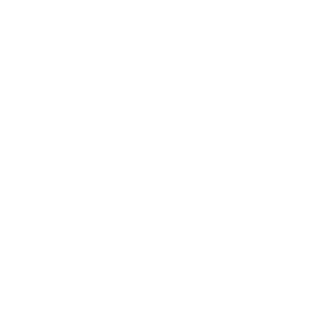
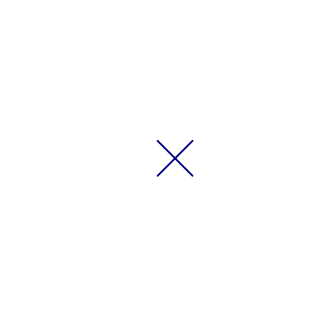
no-connect mark: none -> (175, 158)

